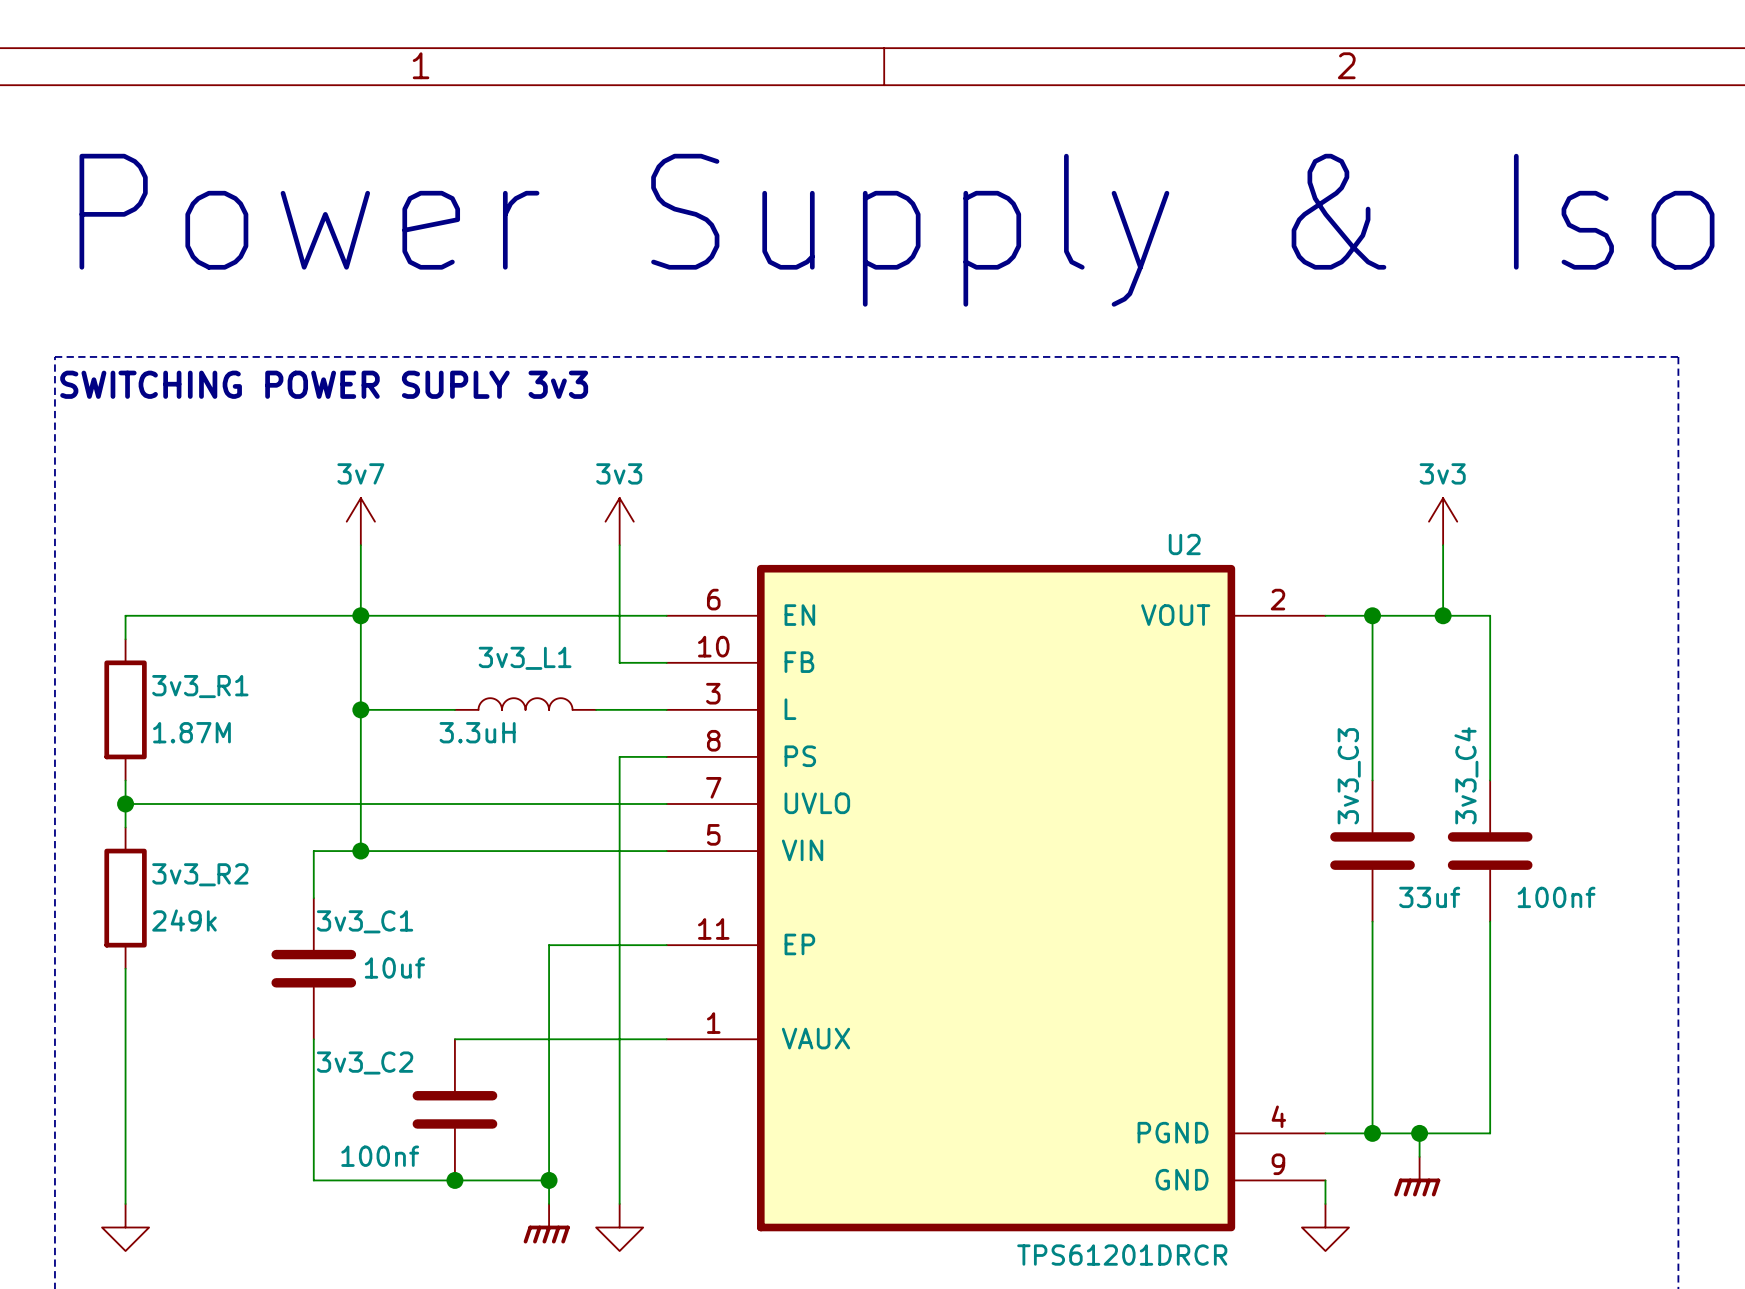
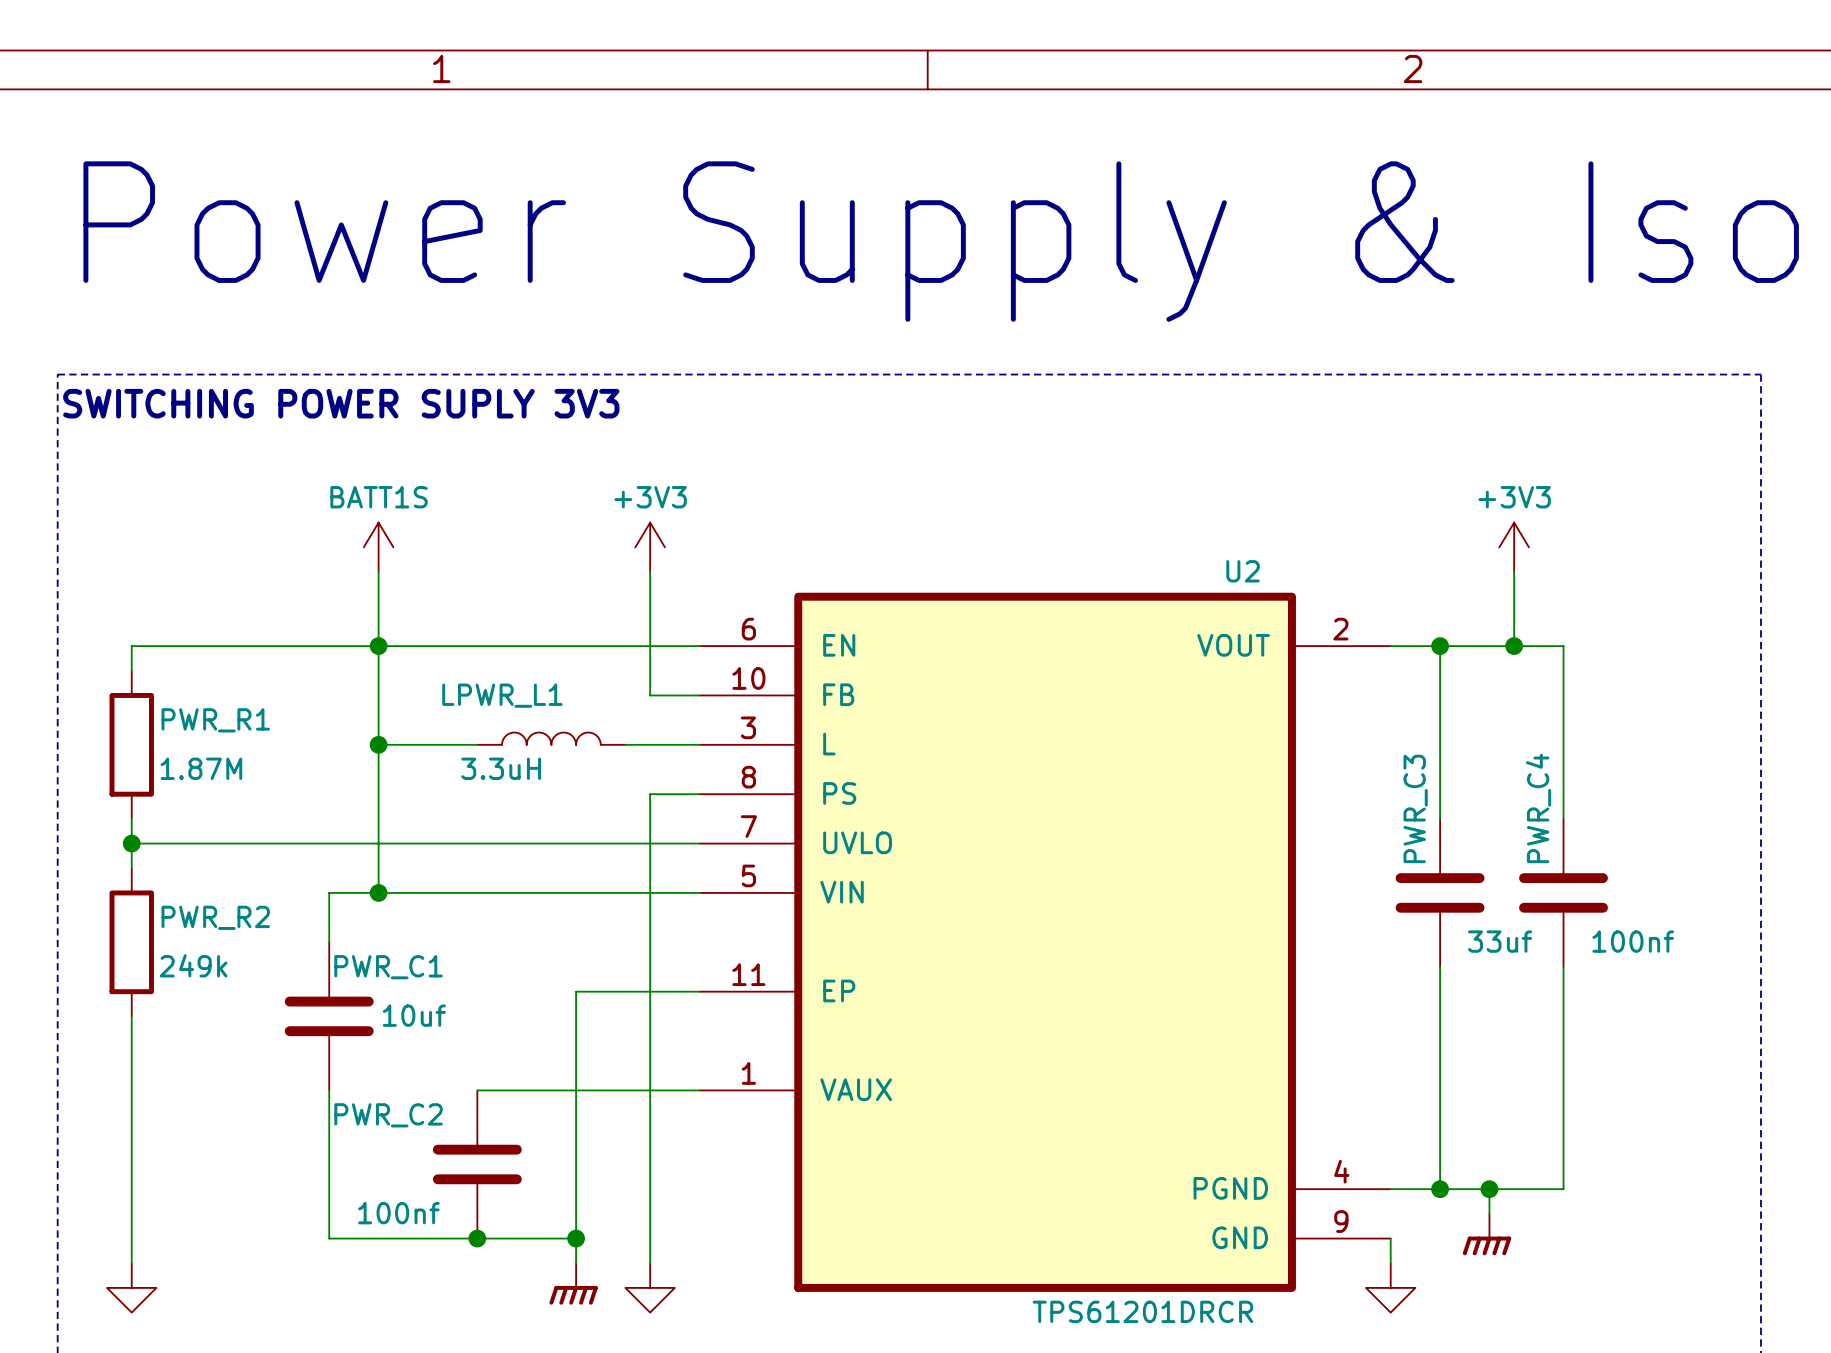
text: SWITCHING POWER SUPLY 3v3 (324, 384) -> SWITCHING POWER SUPLY 3V3 (341, 403)
power symbol: 3v7 (360, 521) -> BATT1S (378, 547)
power symbol: 3v3 (619, 521) -> +3V3 (650, 547)
power symbol: 3v3 (1443, 521) -> +3V3 (1514, 547)
3v3_L1 name: 3v3_L1 (525, 658) -> LPWR_L1 (502, 695)
3v3_R1 name: 3v3_R1 (200, 686) -> PWR_R1 (215, 720)
3v3_C4 name: 3v3_C4 (1466, 775) -> PWR_C4 (1538, 808)
3v3_C3 name: 3v3_C3 (1349, 776) -> PWR_C3 (1415, 808)
3v3_R2 name: 3v3_R2 (200, 874) -> PWR_R2 (215, 917)
3v3_C1 name: 3v3_C1 (365, 921) -> PWR_C1 (388, 967)
3v3_C2 name: 3v3_C2 (365, 1062) -> PWR_C2 (388, 1115)
U2 value position: TPS61201DRCR (1122, 1255) -> TPS61201DRCR (1142, 1311)

